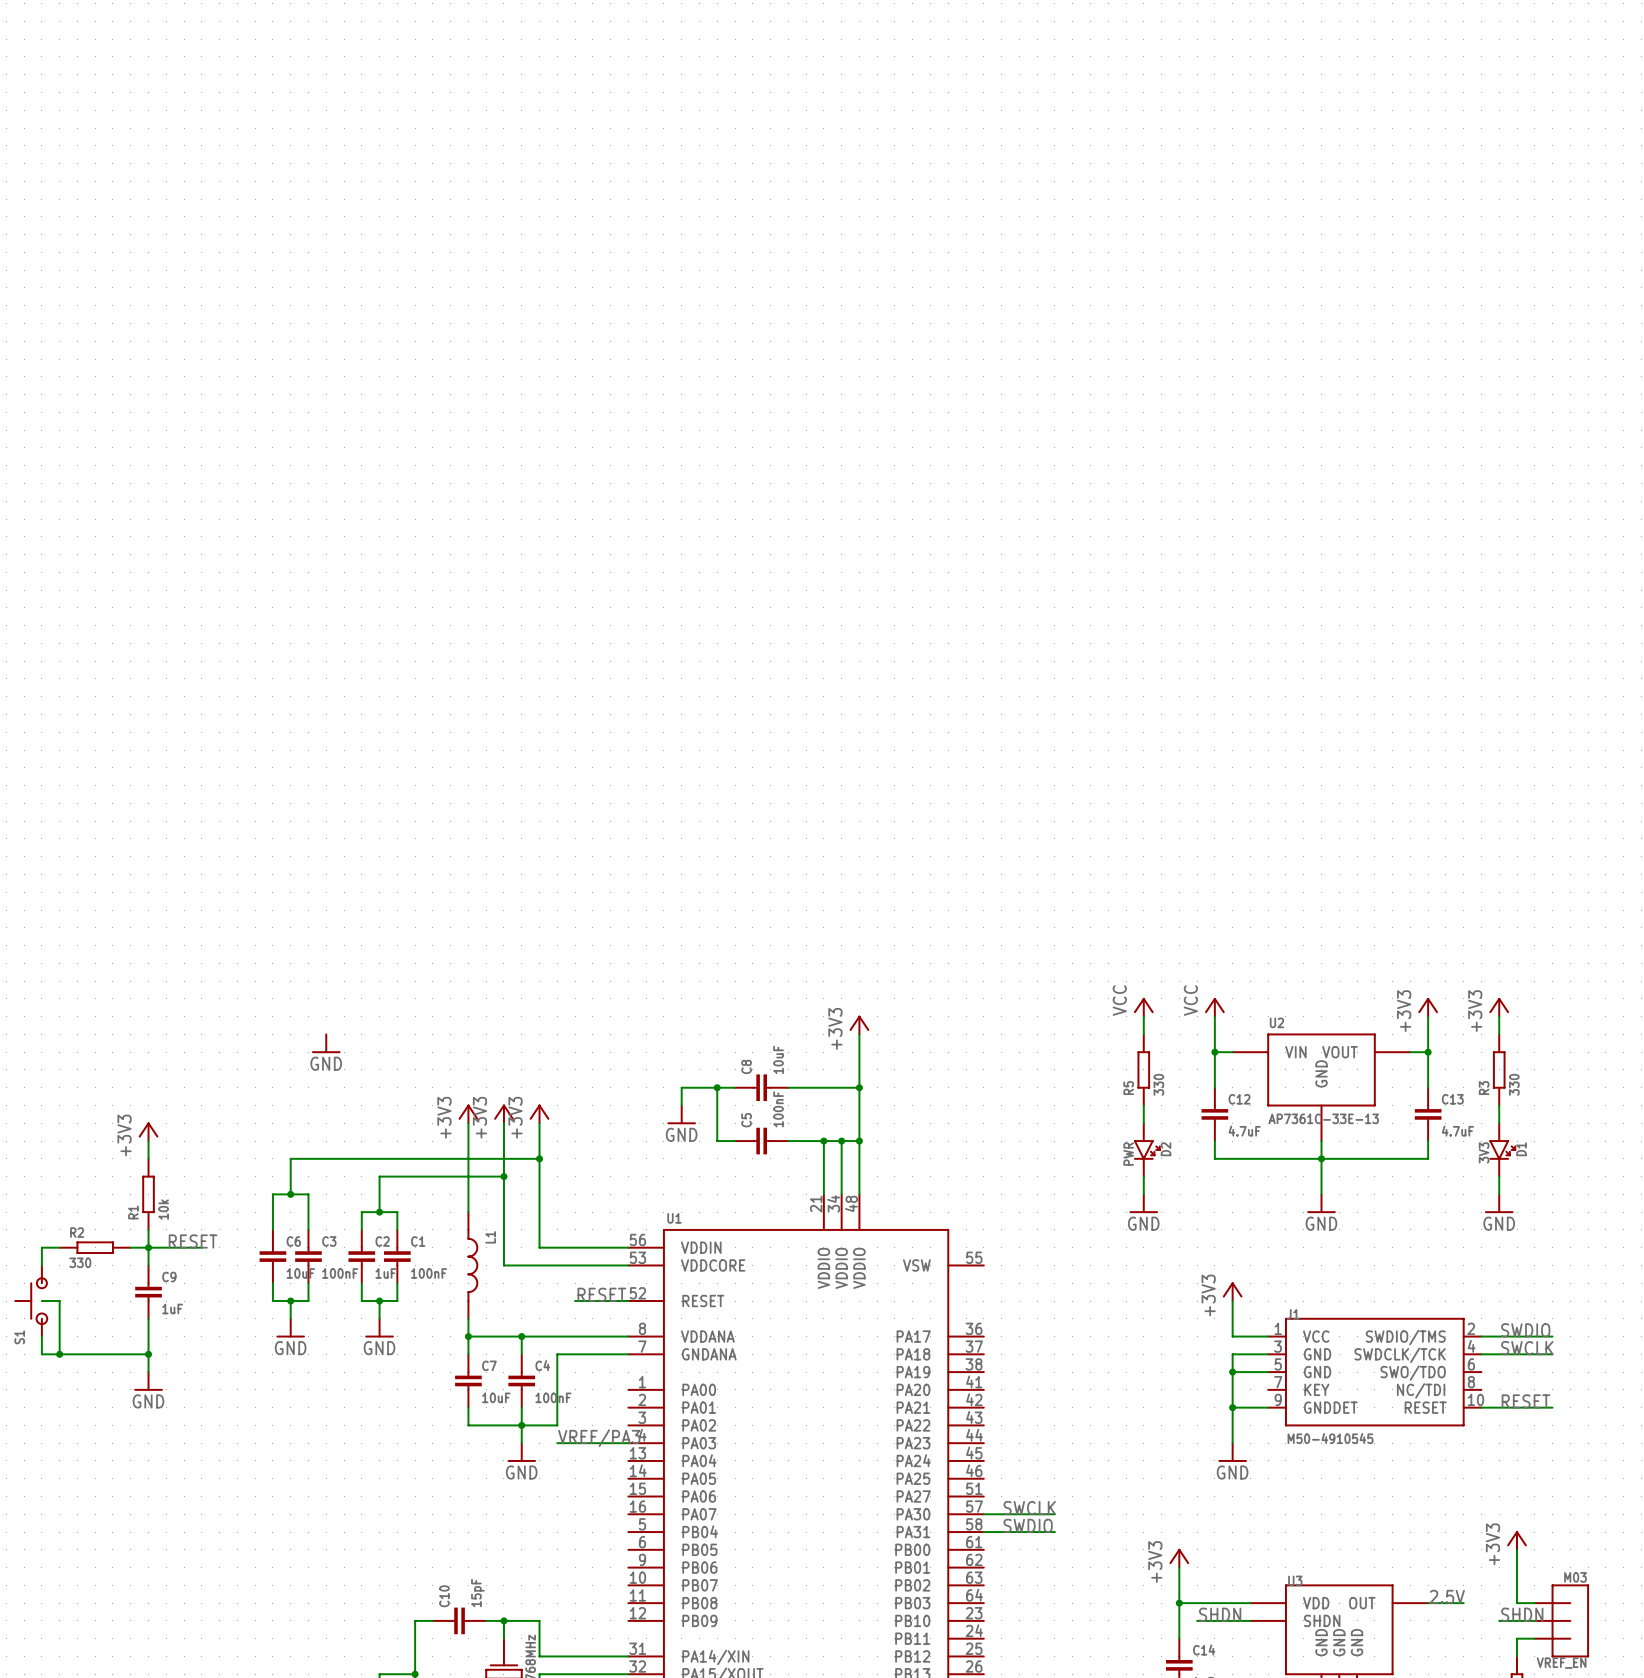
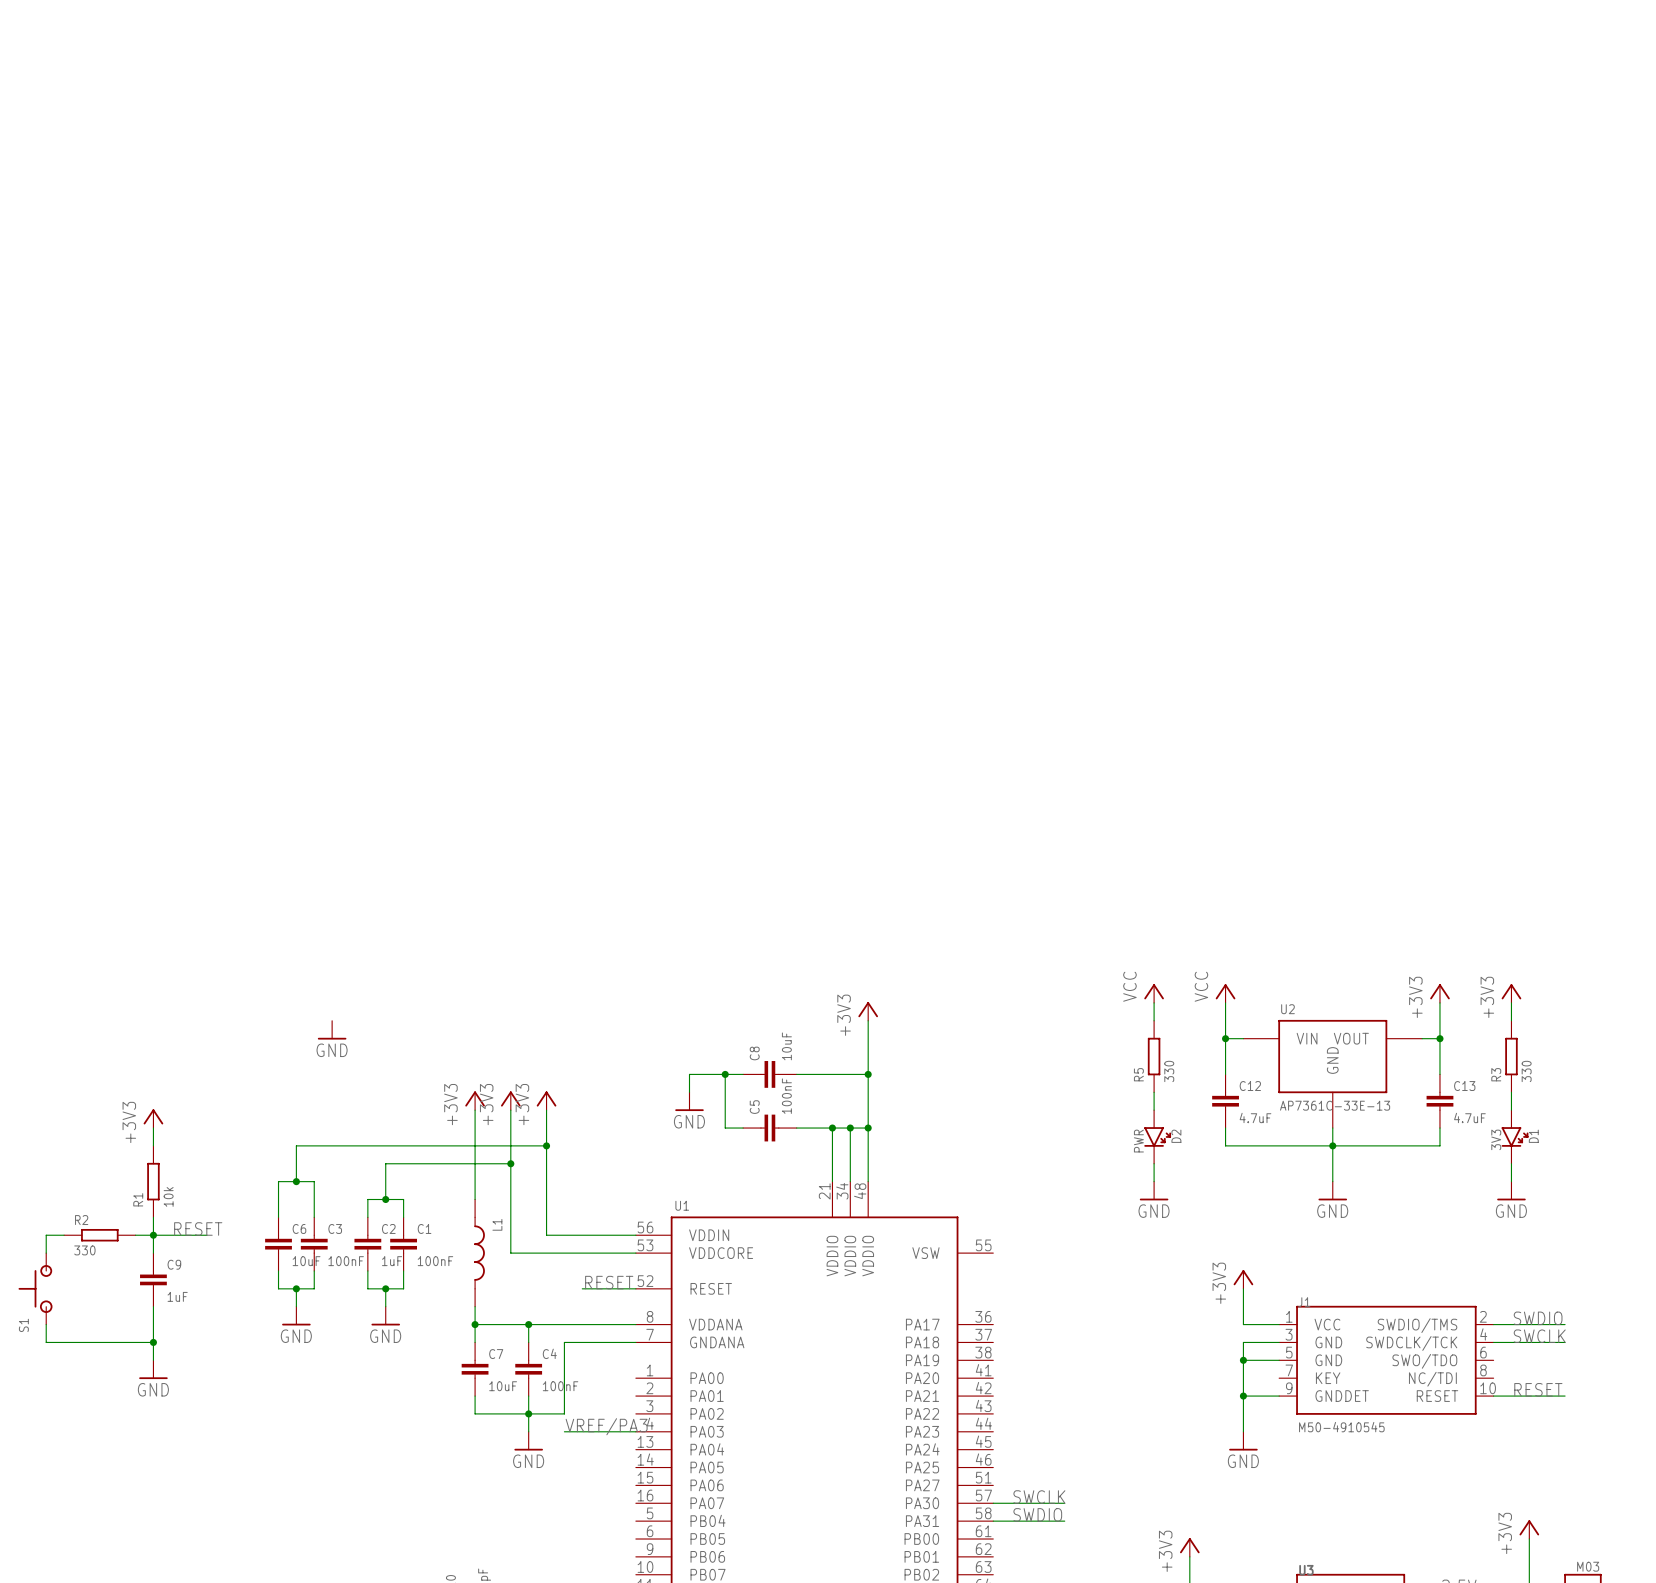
wire: (41, 1301) (59, 1301) (59, 1354) -> none
junction: (59, 1354) -> none

